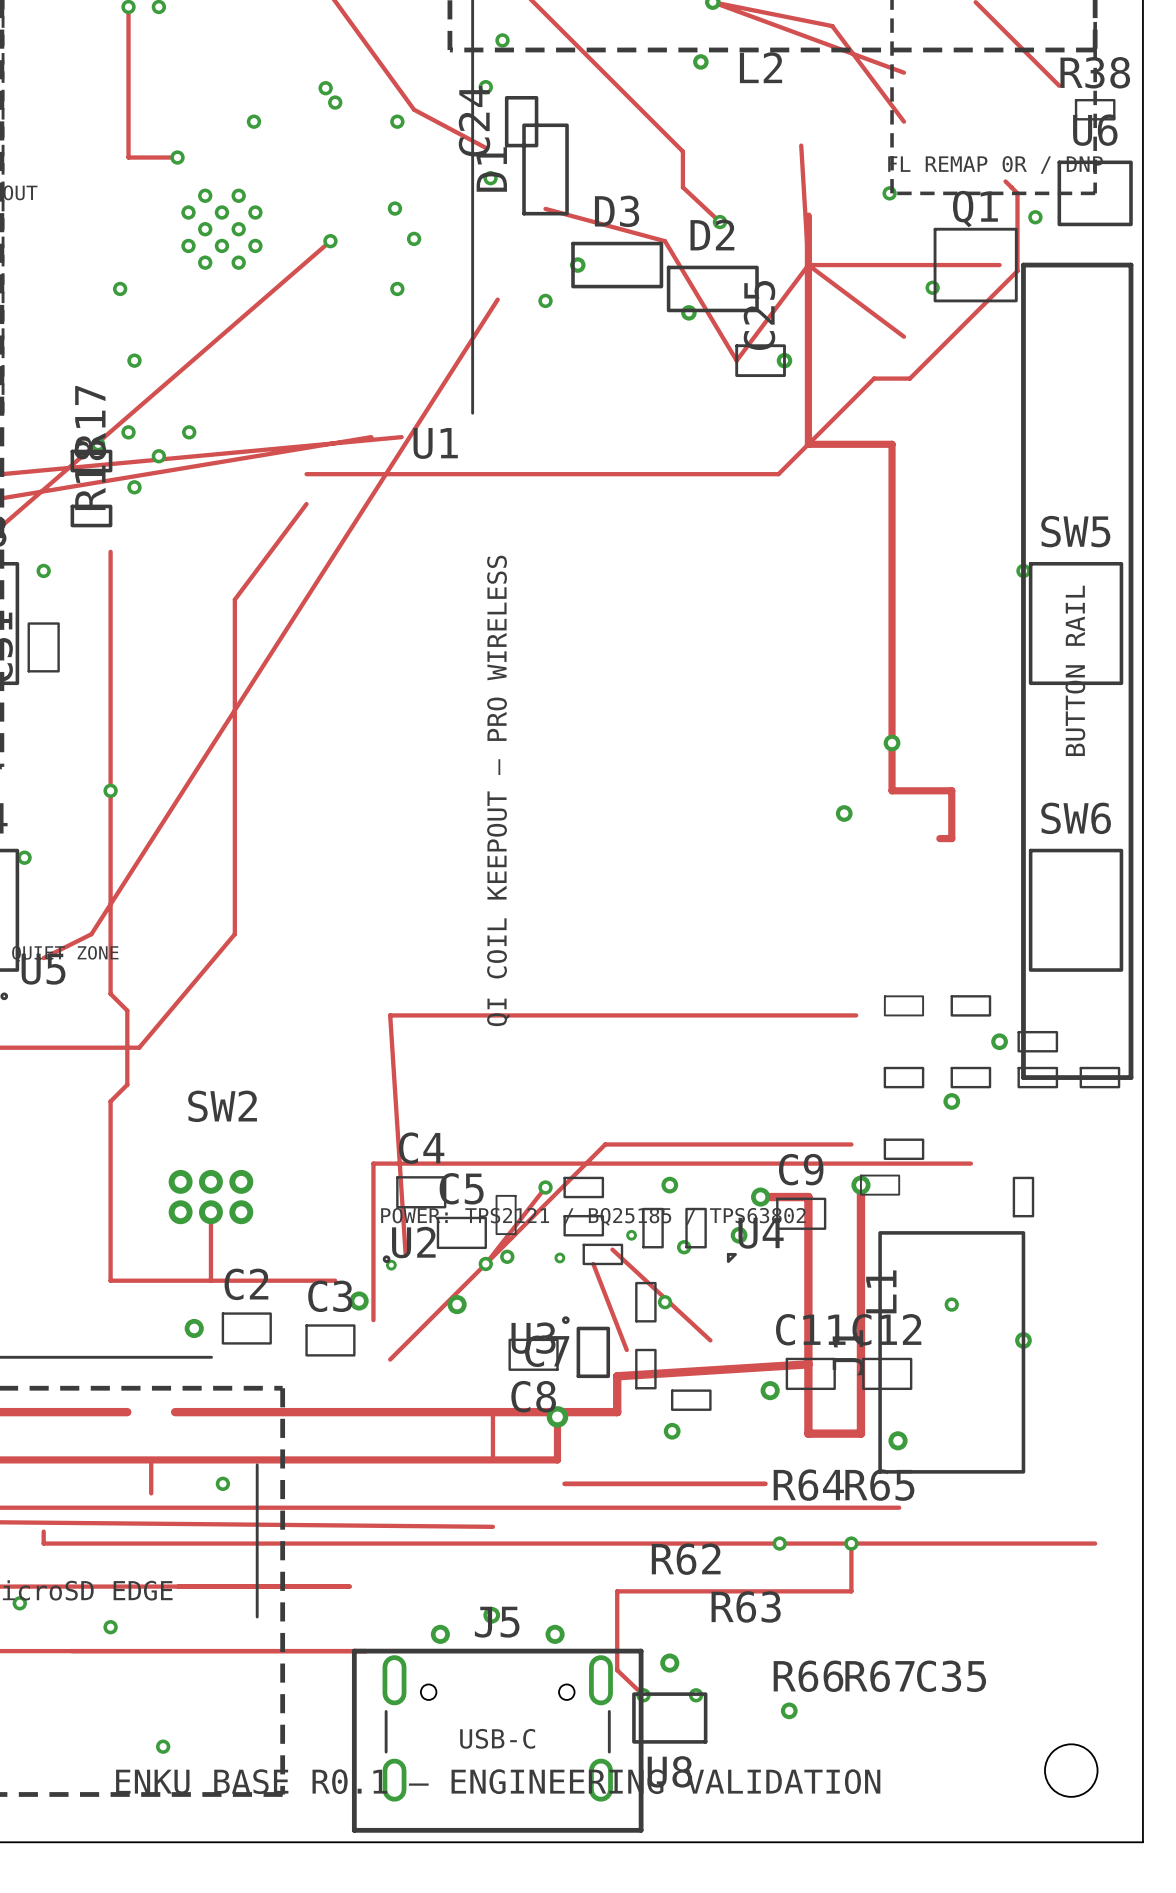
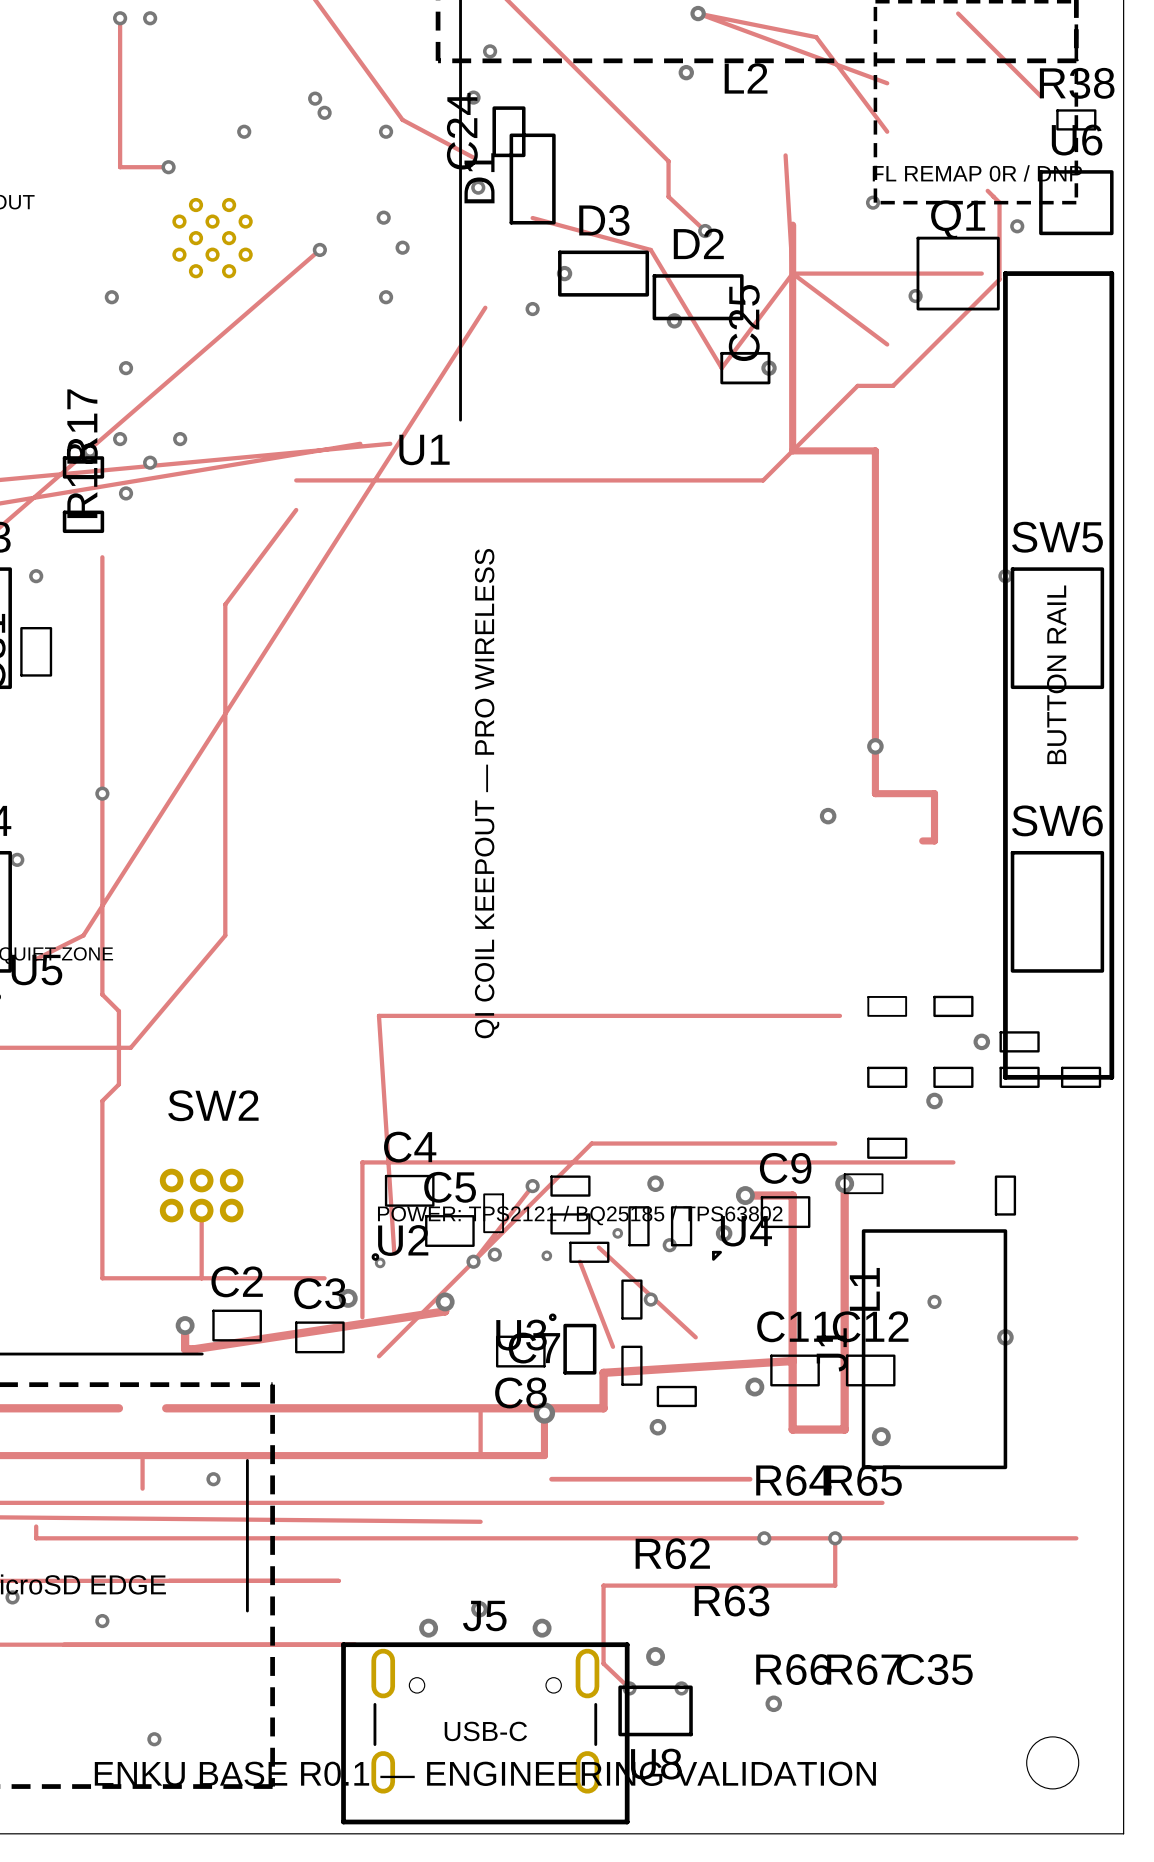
track: none -> (445, 1301) (445, 1311) (194, 1349) (185, 1349) (185, 1325)

